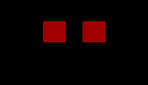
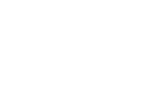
part: (74, 31) -> none

